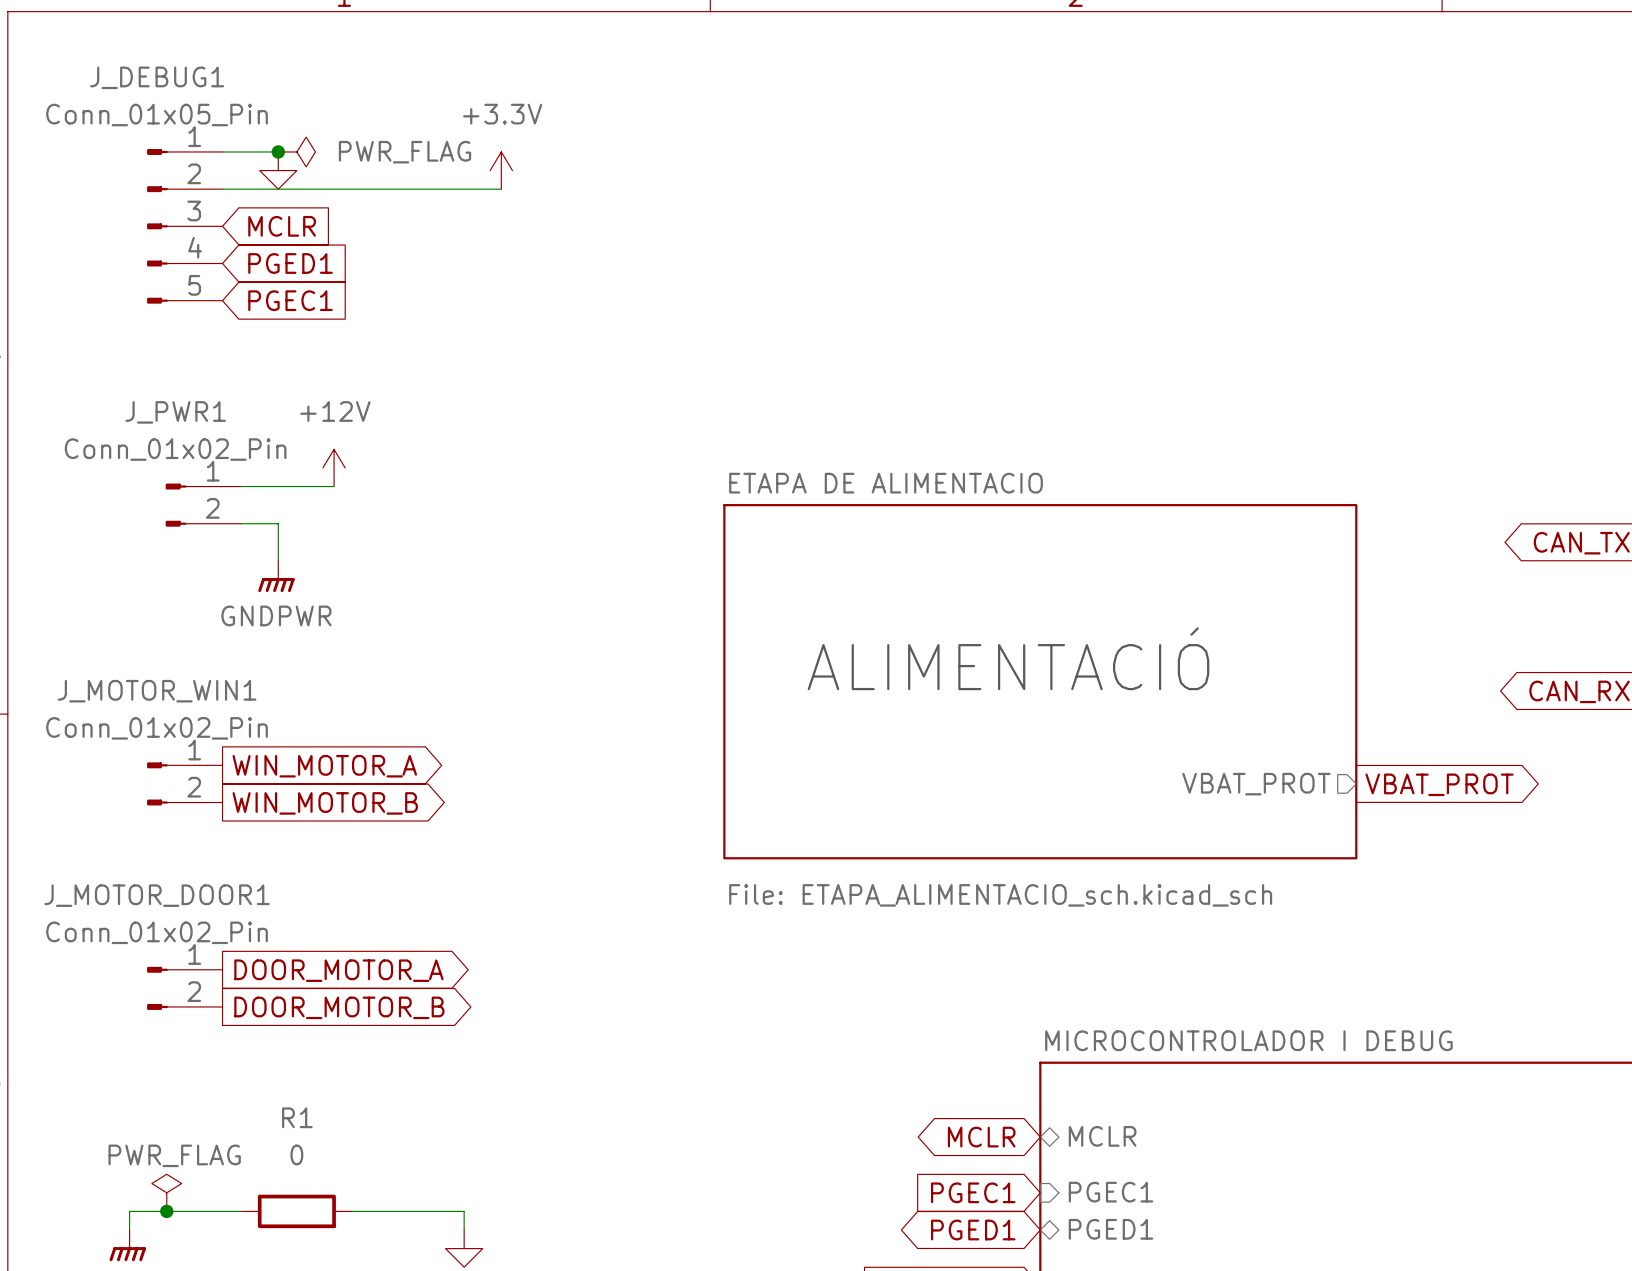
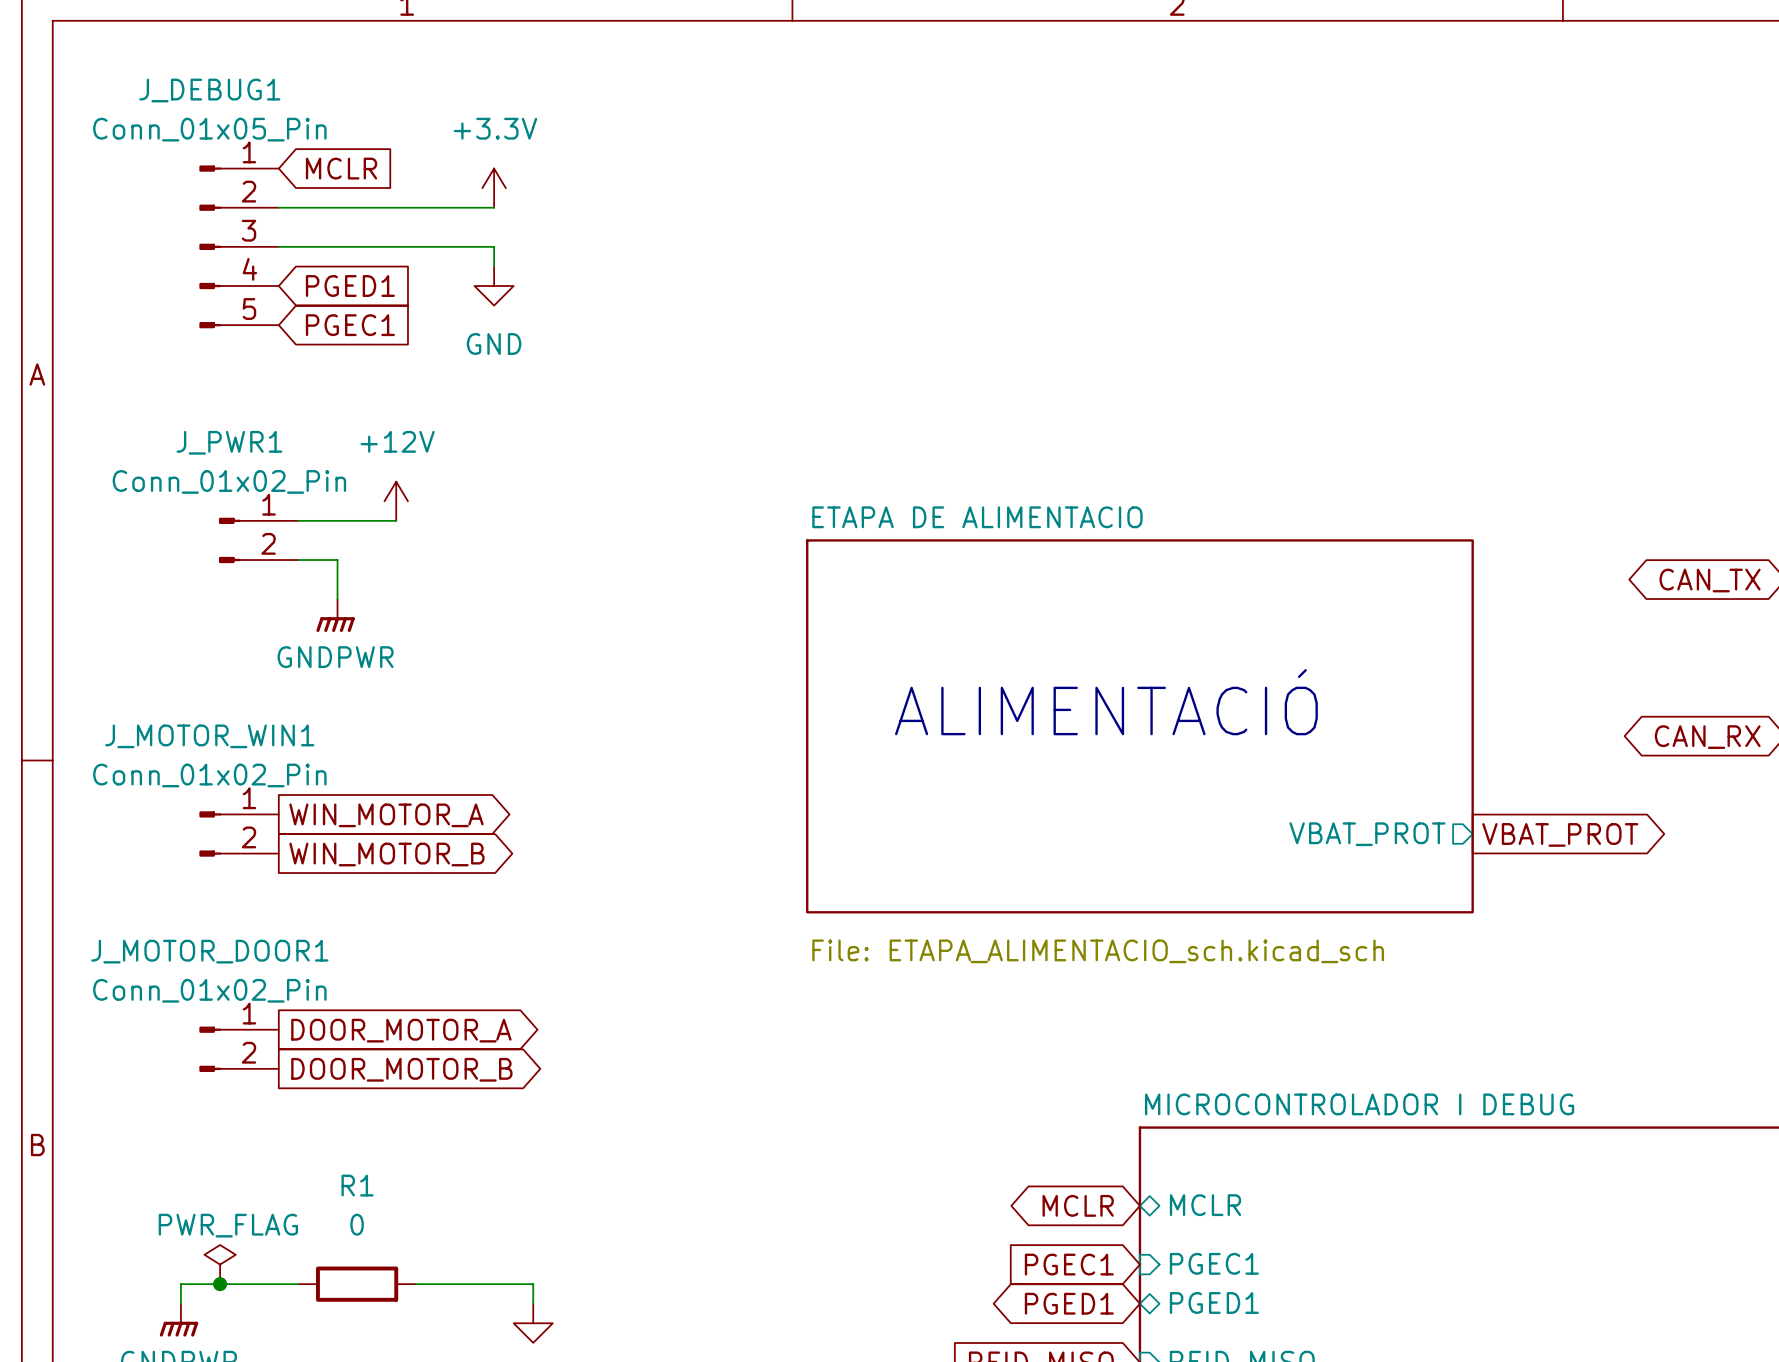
wire: (222, 151) (278, 151) -> none
junction: (278, 151) -> none
power symbol: PWR_FLAG (296, 151) -> none
power symbol: (278, 170) -> none
power symbol position: +3.3V (501, 170) -> +3.3V (494, 188)
wire: (426, 189) (501, 189) -> none
wire: none -> (278, 246) (494, 246) (494, 266)
global label position: MCLR (282, 226) -> MCLR (341, 168)
power symbol: none -> GND (494, 286)

